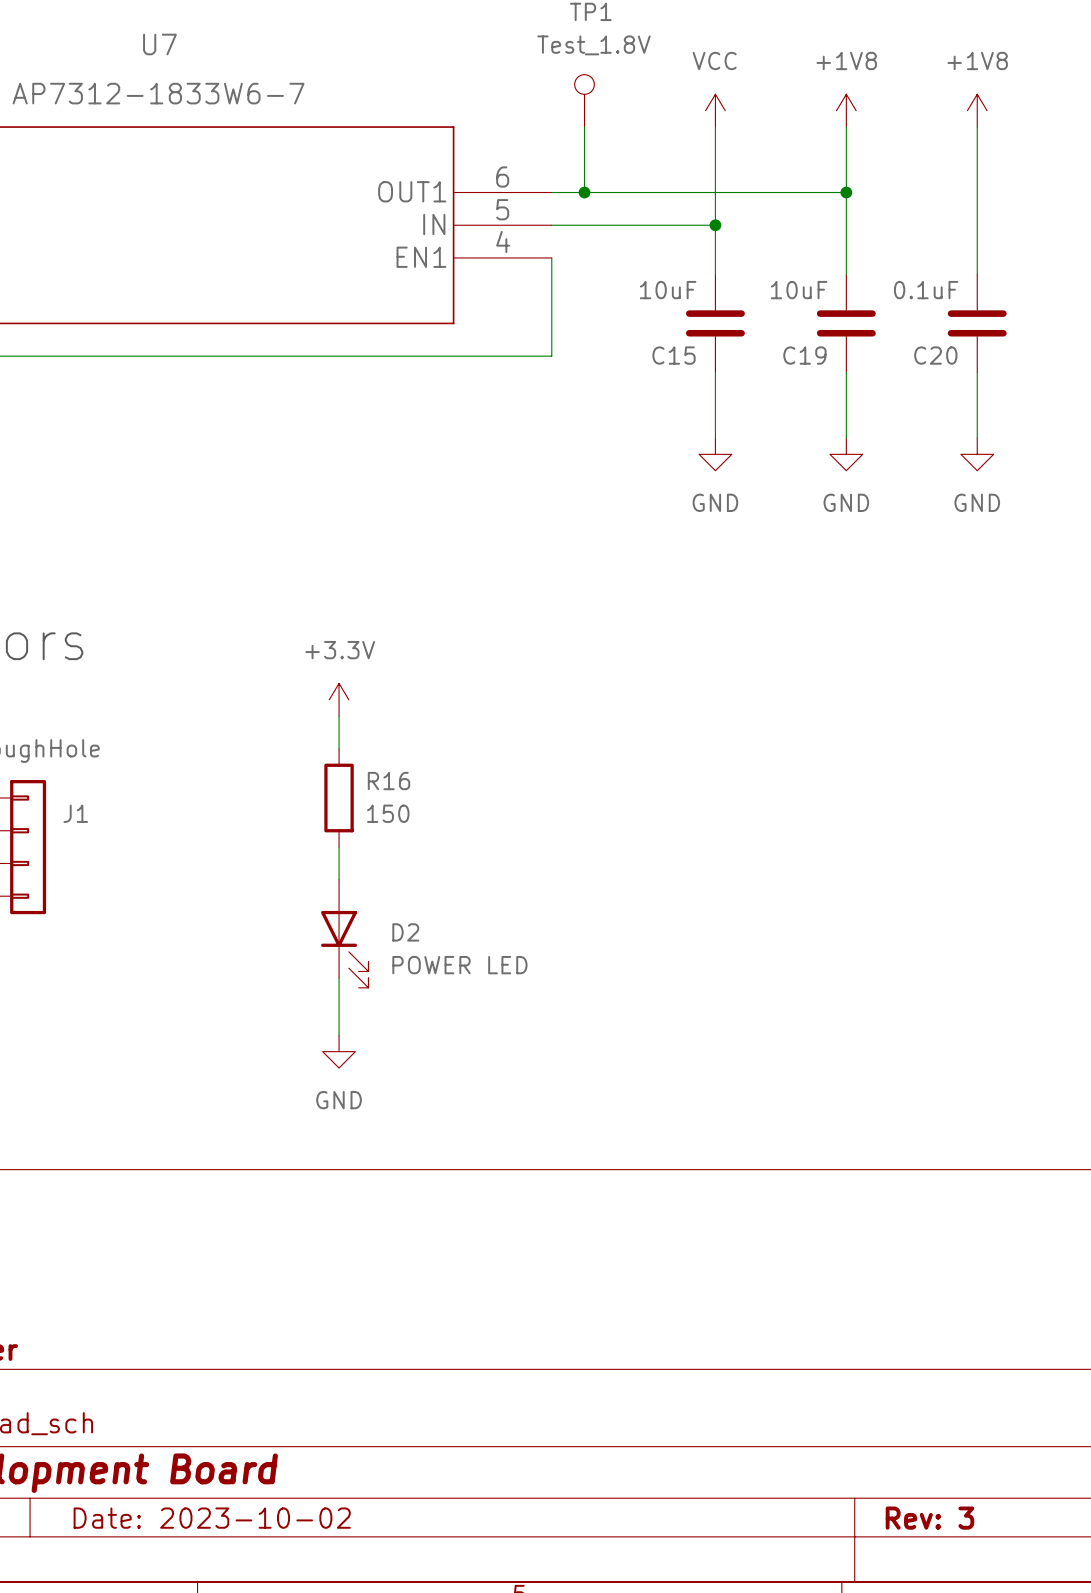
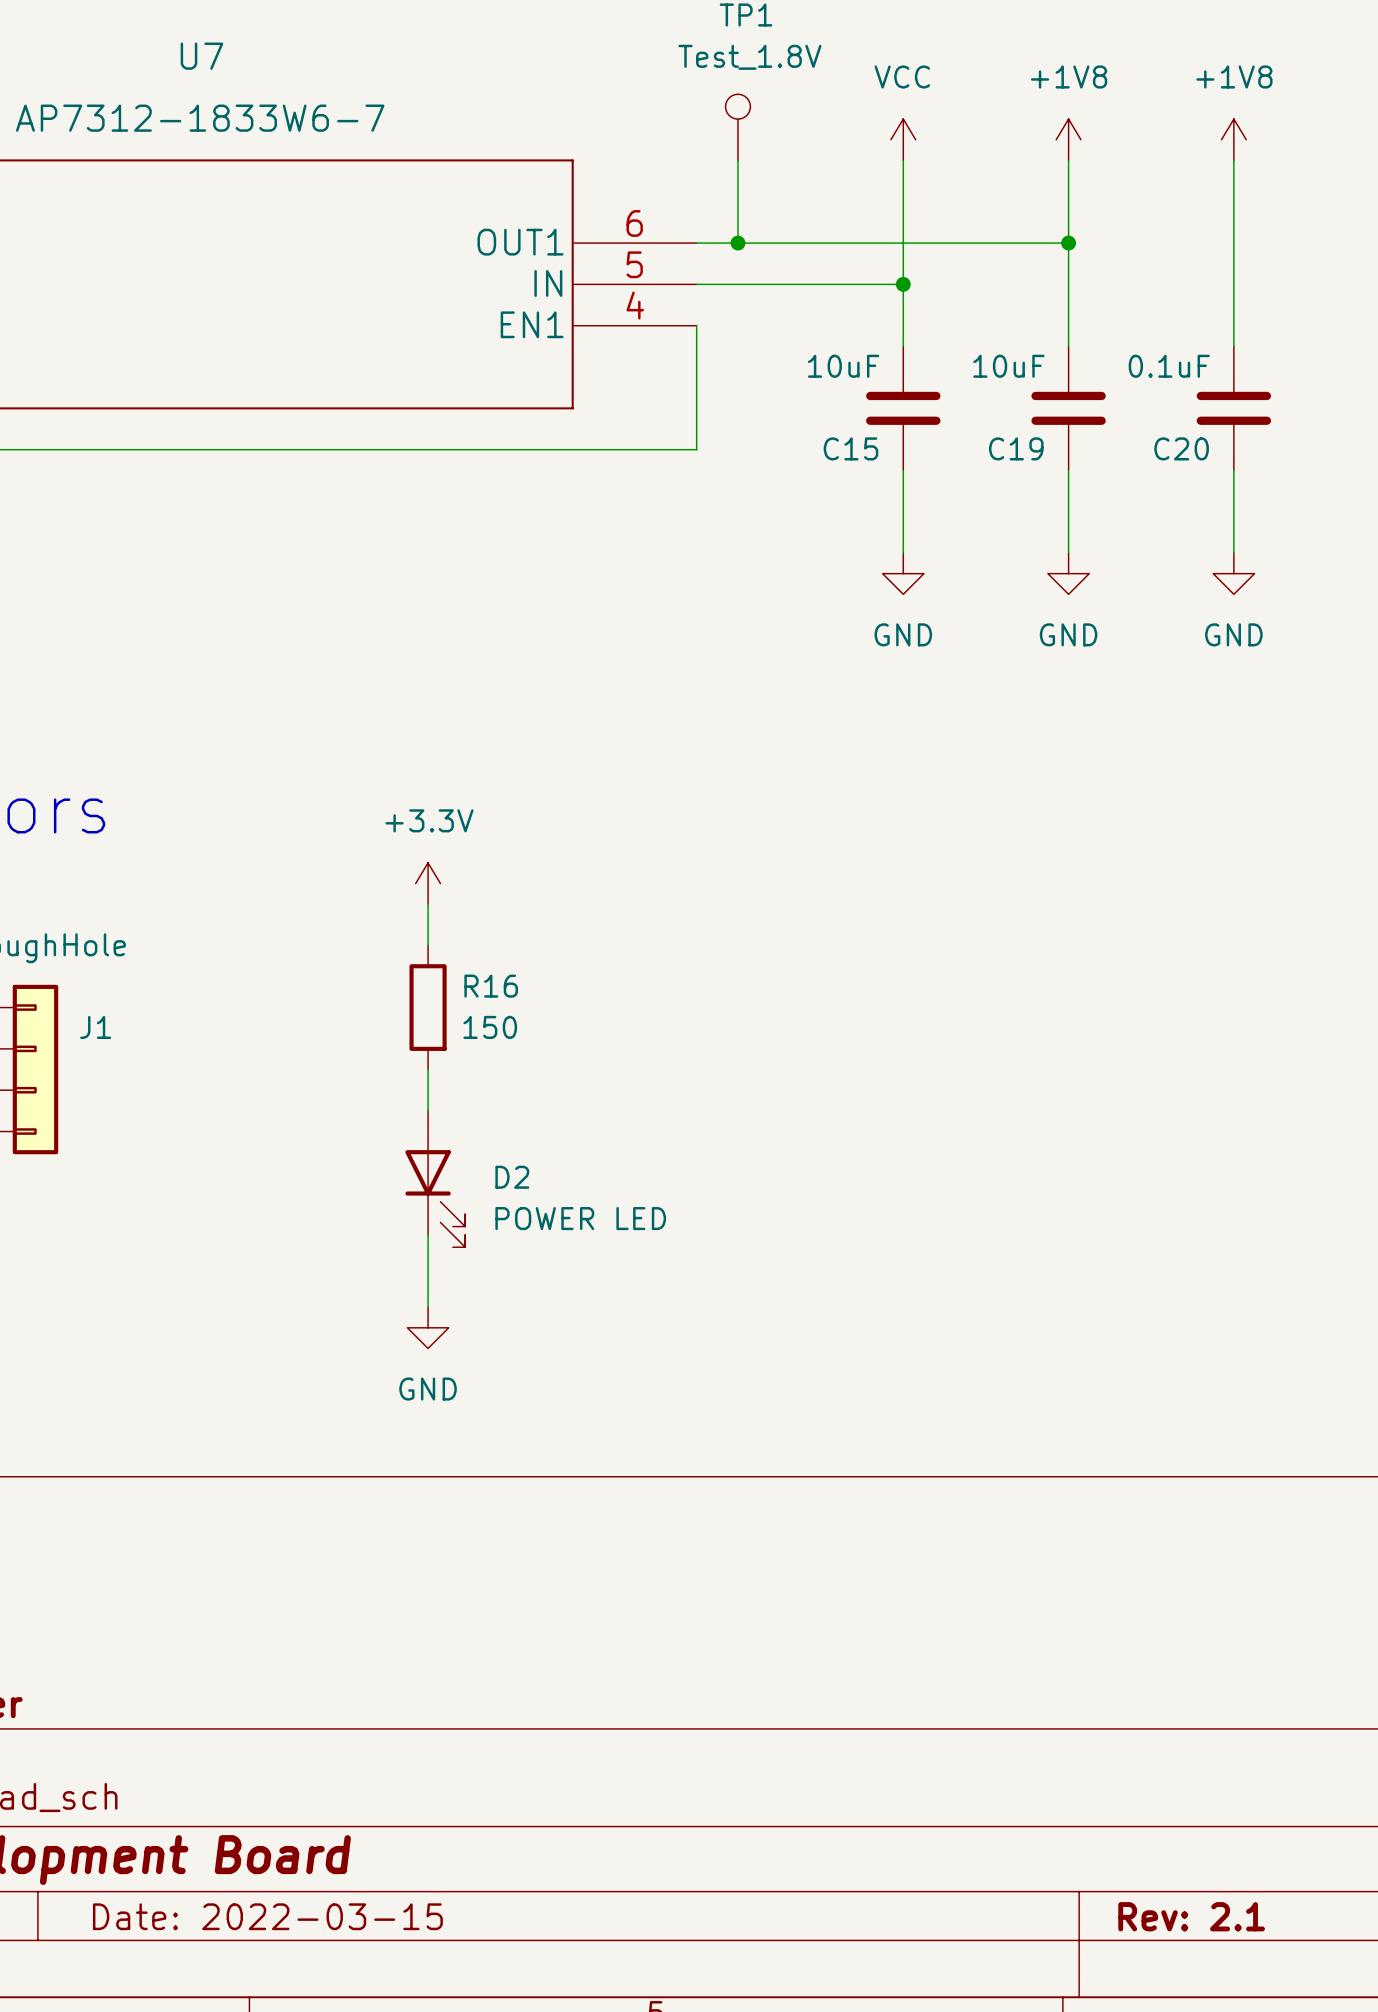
title block: Date: 2023-10-02 (212, 1518) -> Date: 2022-03-15 (267, 1916)
title block: Rev: 3 (929, 1518) -> Rev: 2.1 (1191, 1916)

